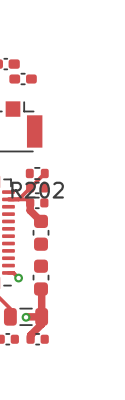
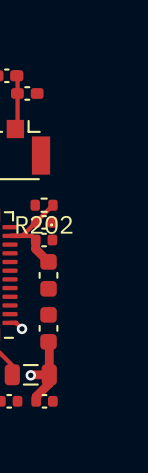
track: none -> (14, 72) (17, 72) (17, 129) (13, 129)

